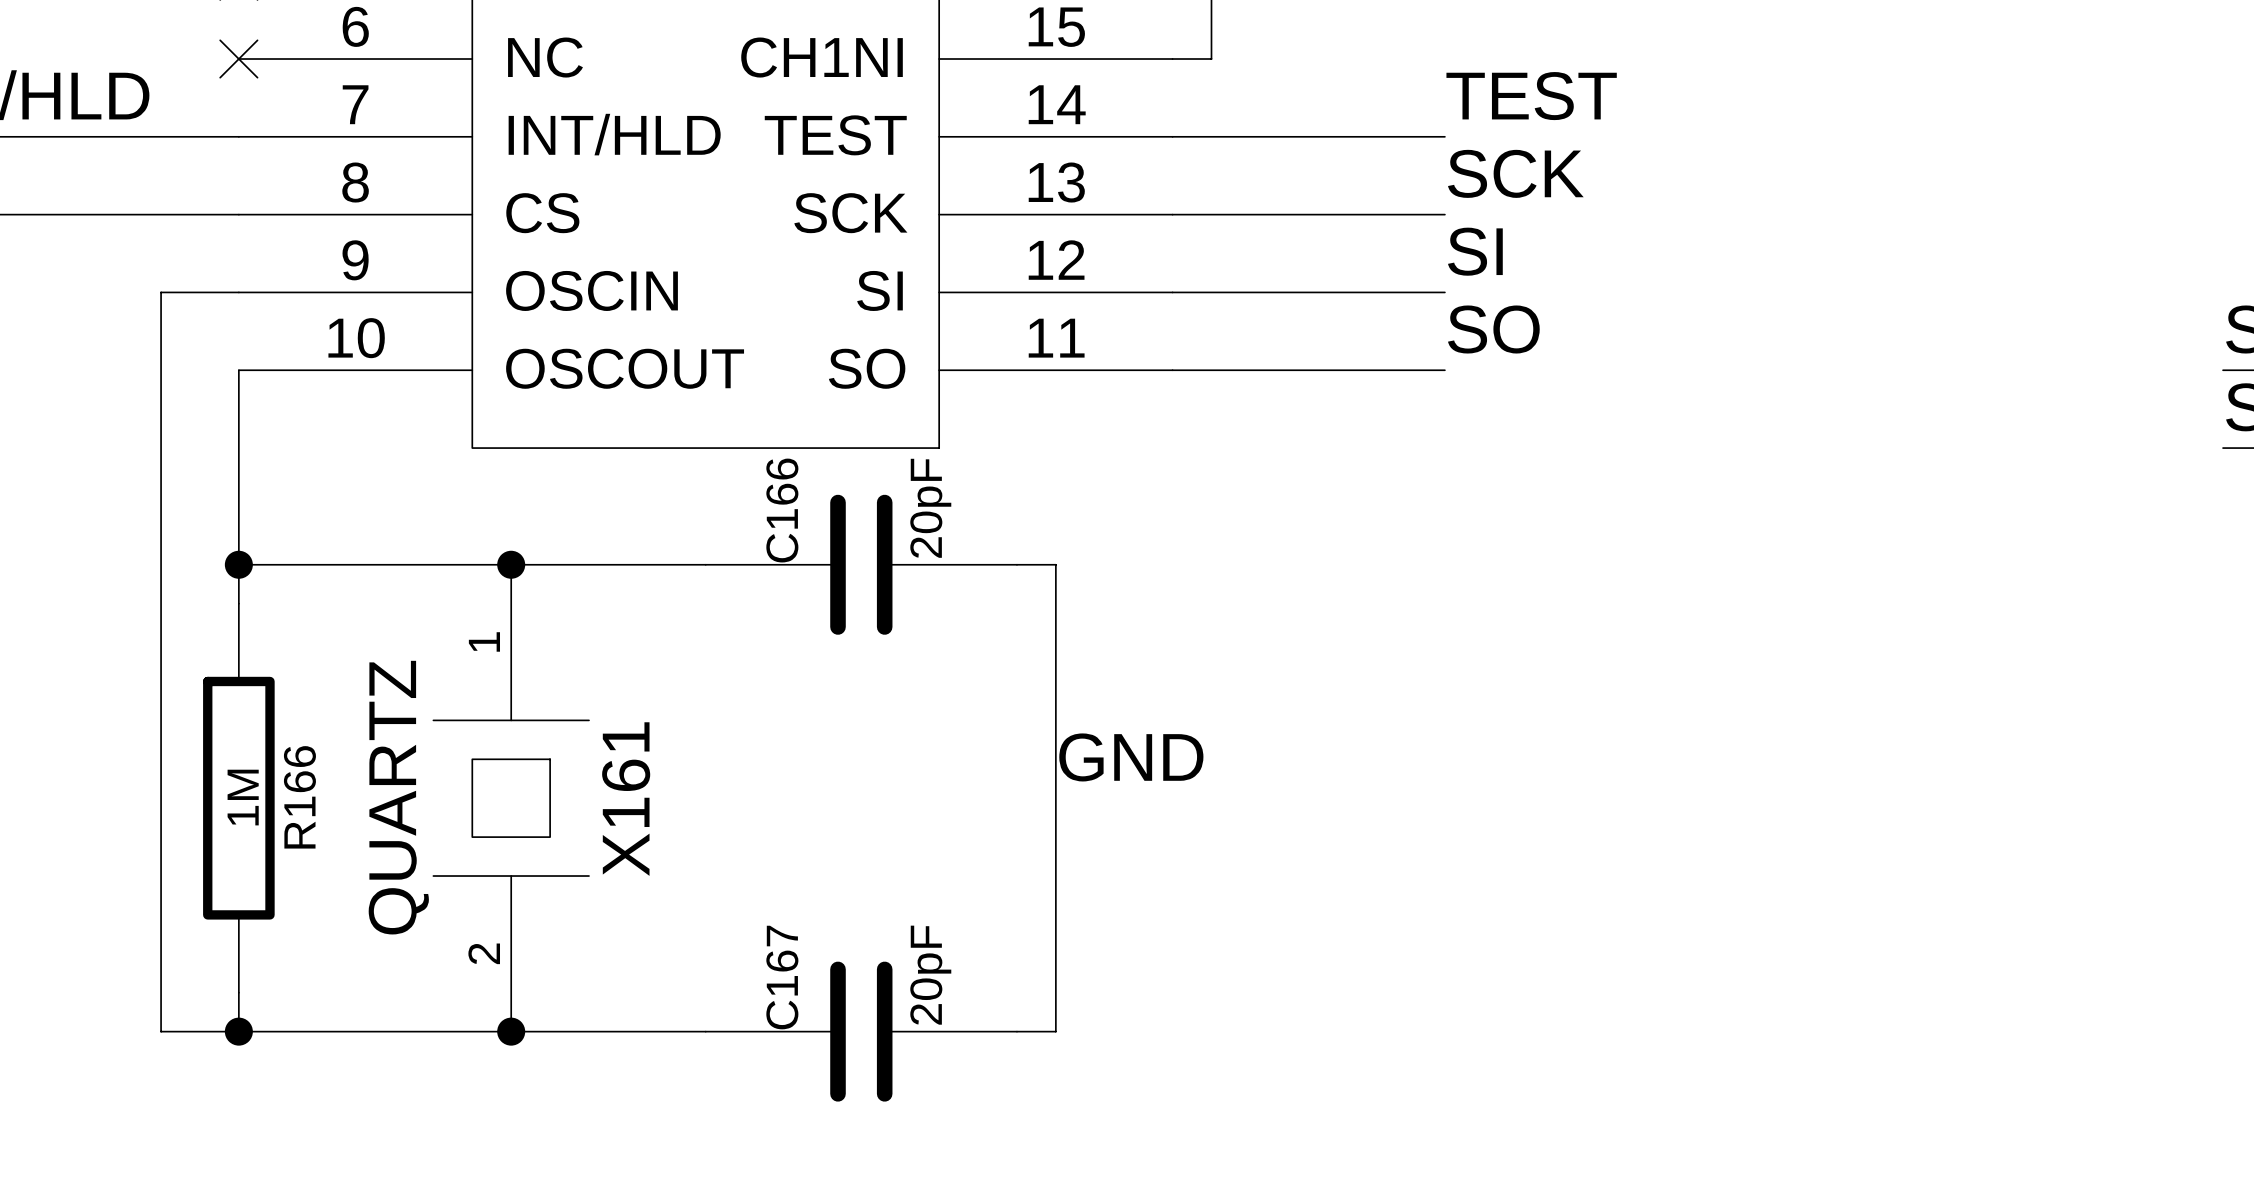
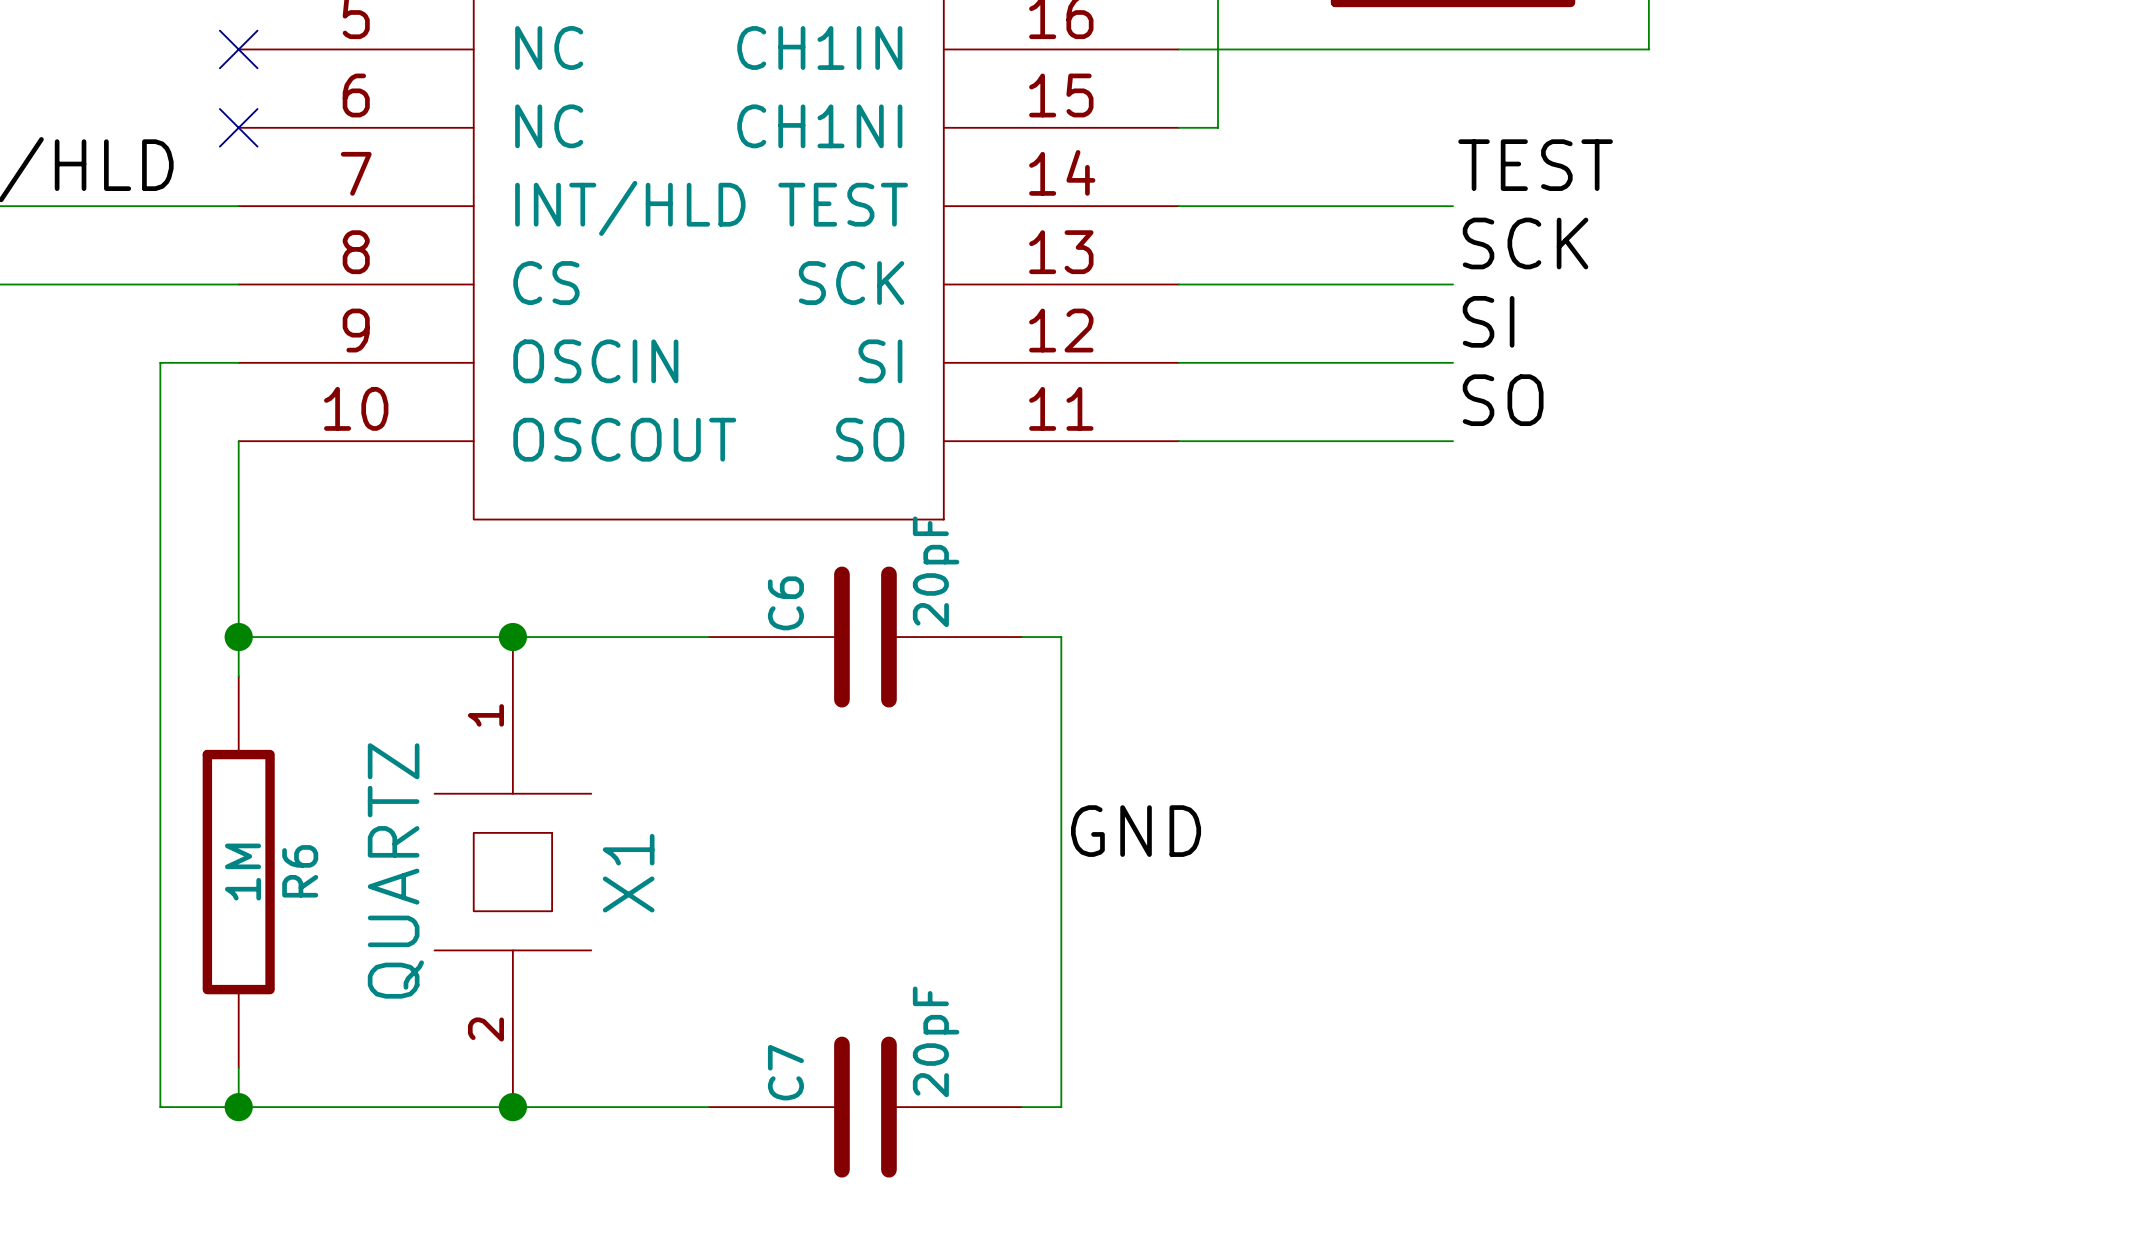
C166 name: C166 (782, 510) -> C6 (785, 603)
R166 name: R166 (299, 797) -> R6 (300, 871)
X161 name: X161 (626, 799) -> X1 (628, 873)
C167 name: C167 (782, 977) -> C7 (785, 1072)

